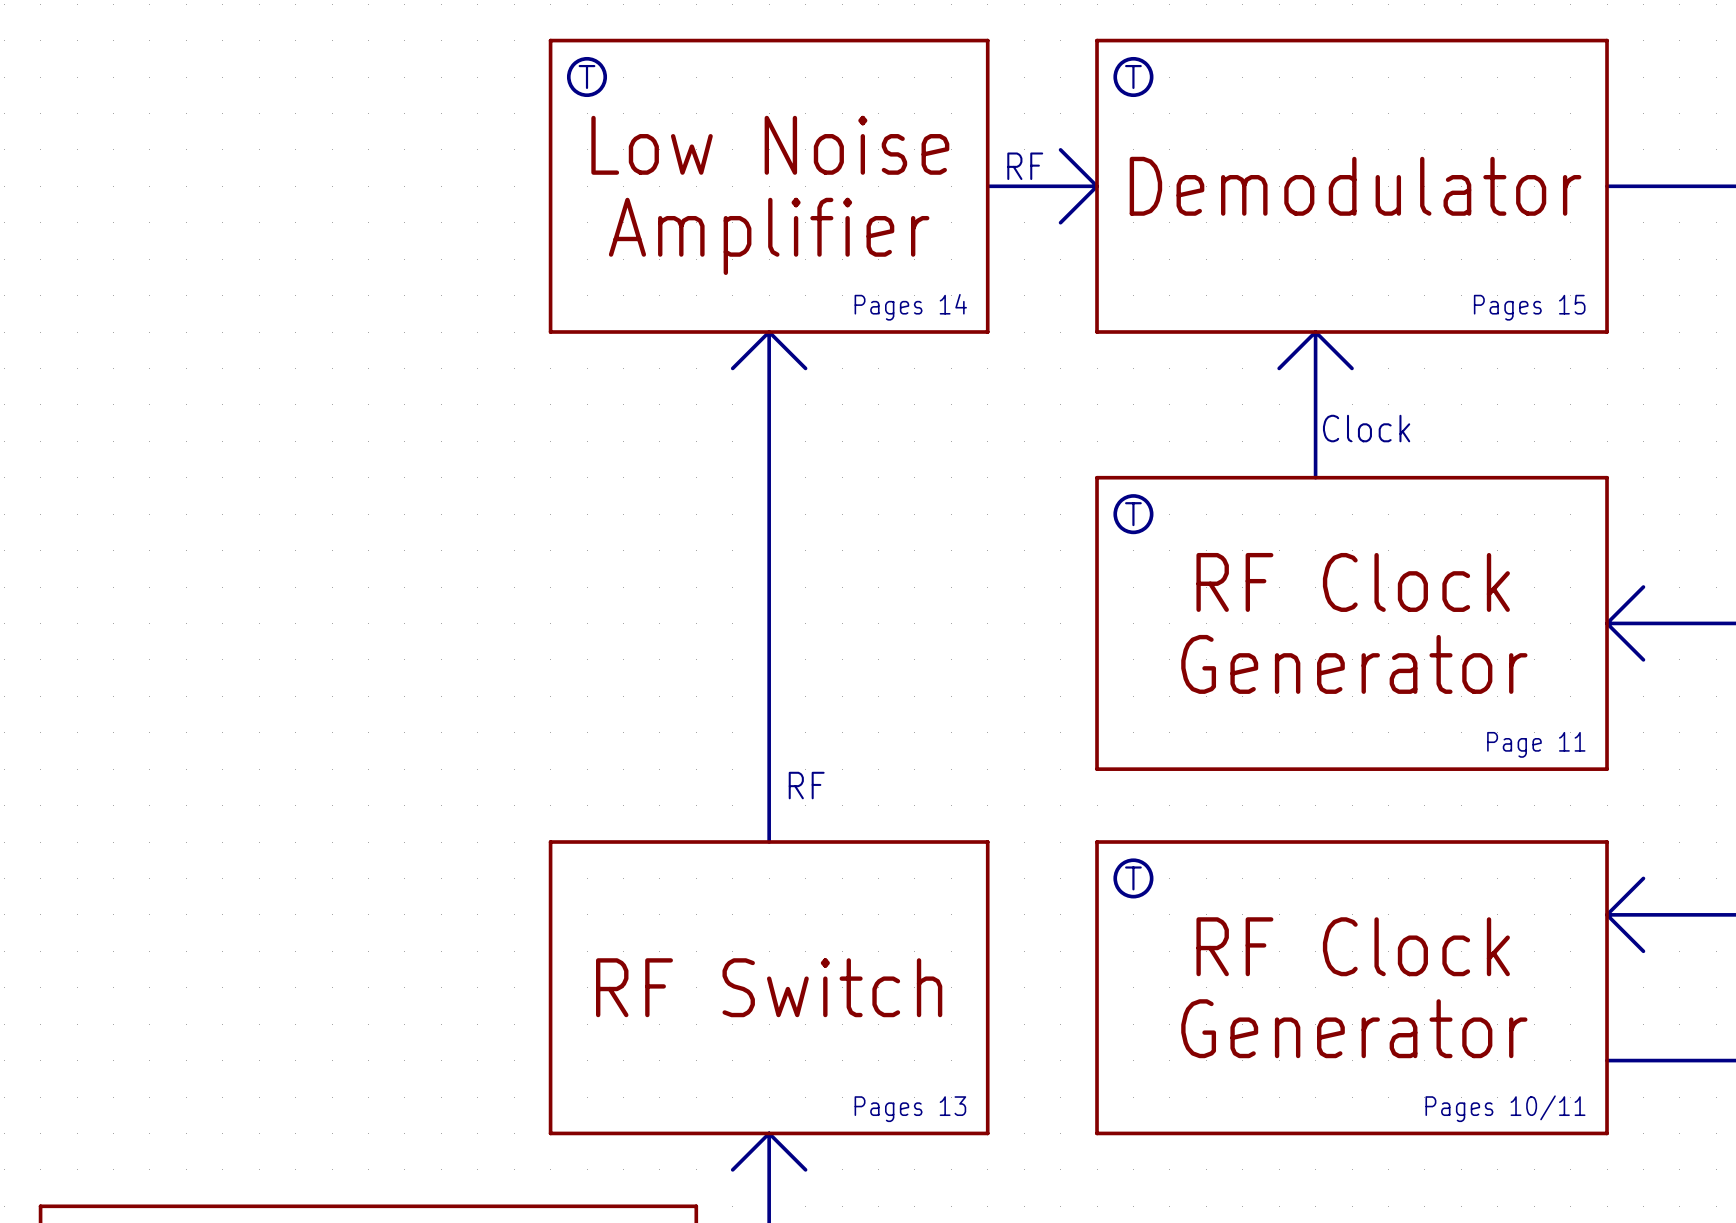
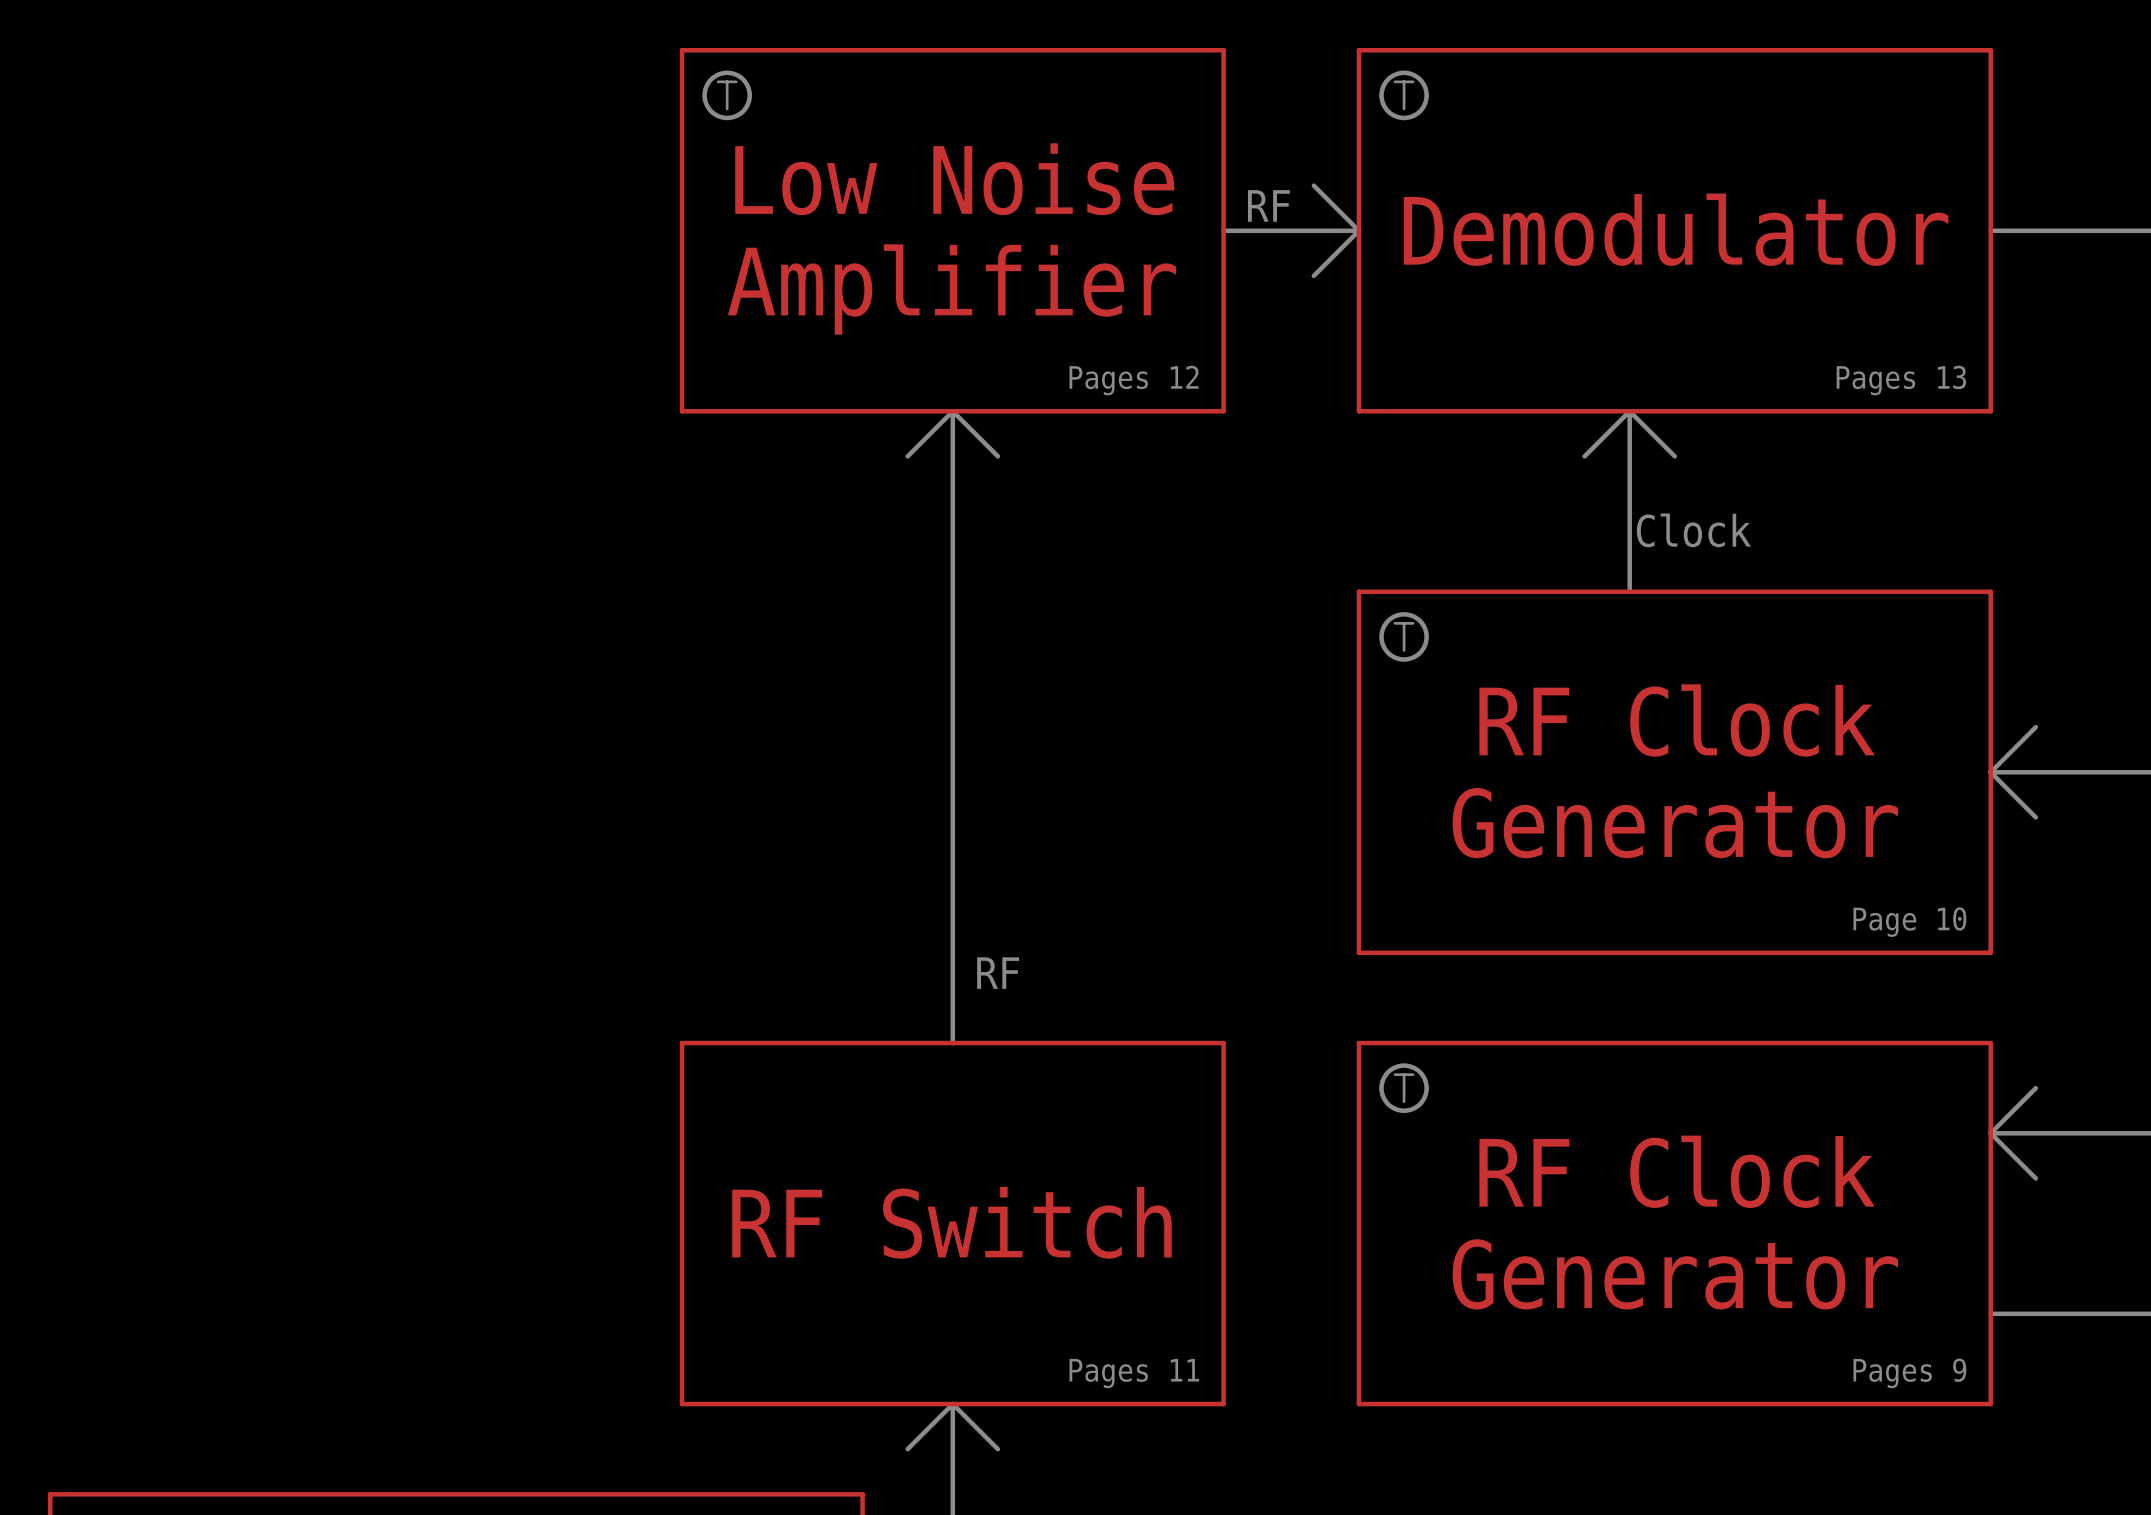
text: Pages 14 (910, 307) -> Pages 12 (1134, 380)
text: Pages 15 (1529, 307) -> Pages 13 (1901, 380)
text: Page 11 (1536, 744) -> Page 10 (1909, 922)
text: Pages 10/11 (1505, 1108) -> Pages 9 (1909, 1373)
text: Pages 13 (910, 1109) -> Pages 11 (1134, 1373)

